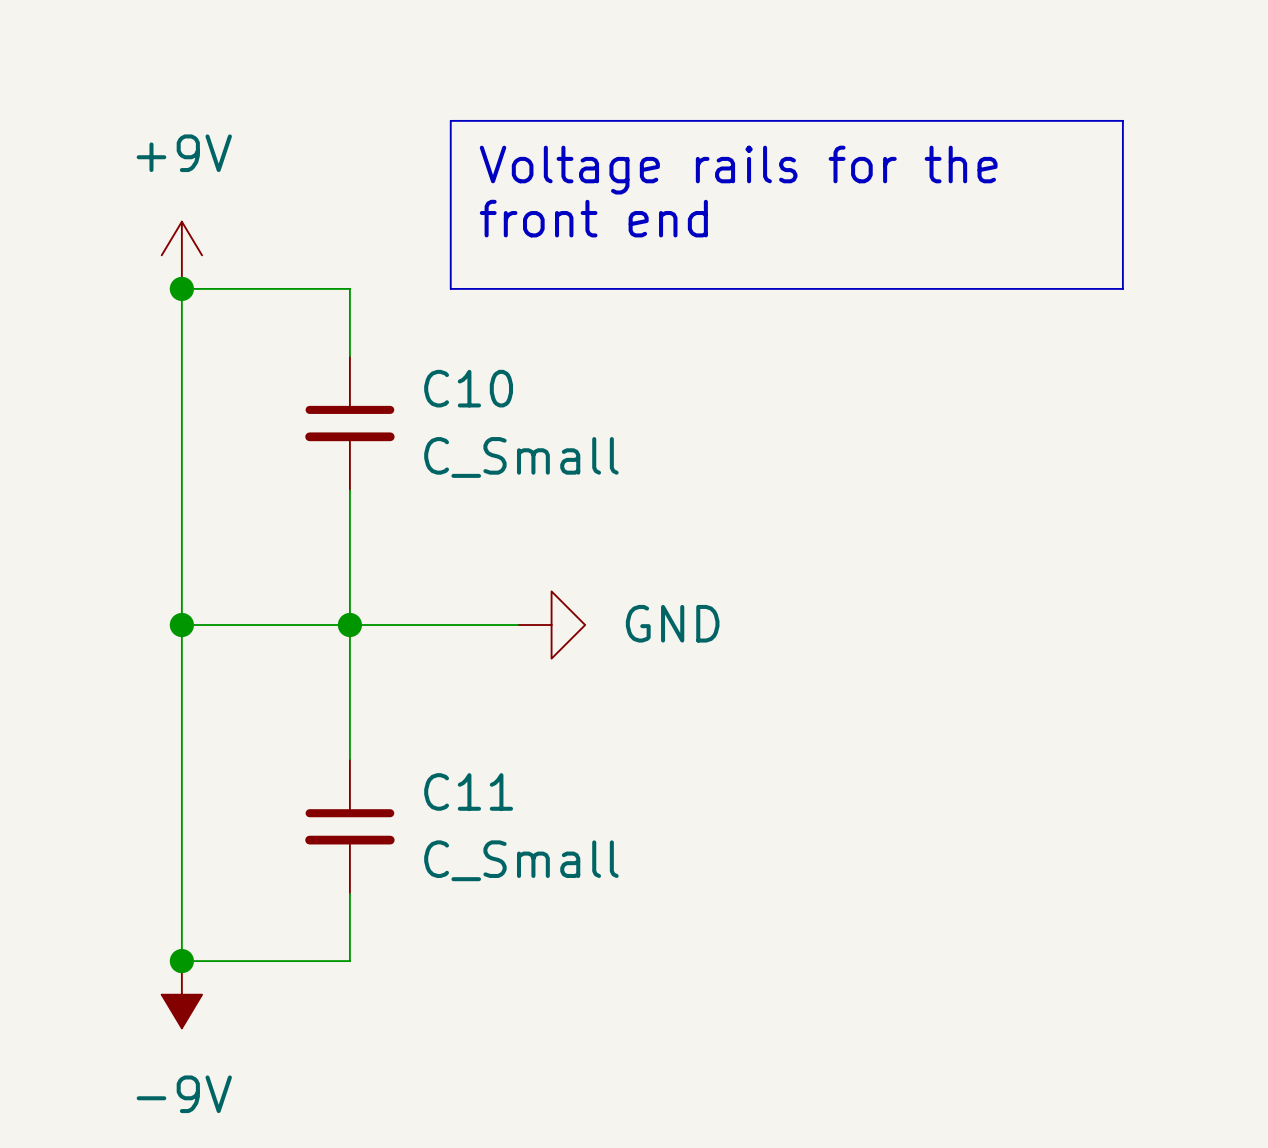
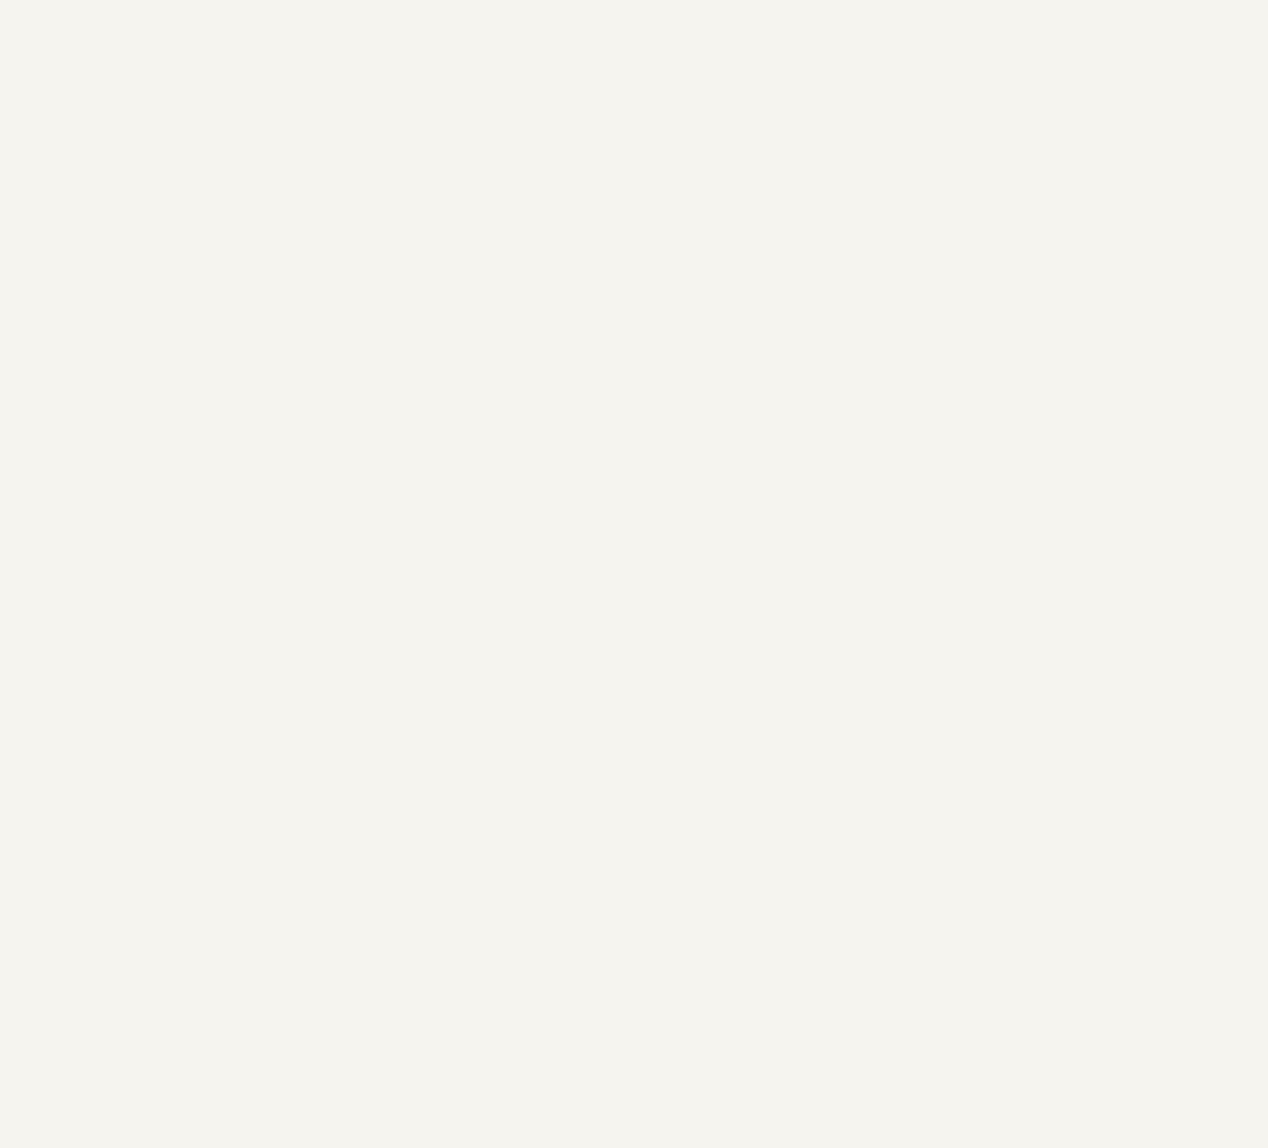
line: (450, 120) (1122, 120) (1122, 288) (450, 288) (450, 120) -> none
text: Voltage rails for the (738, 170) -> none
text: front end (593, 218) -> none
power symbol: +9V (181, 255) -> none
junction: (181, 288) -> none
wire: (349, 356) (349, 288) (181, 288) (181, 961) (349, 961) (349, 893) -> none
C10: C_Small (349, 423) -> none
wire: (349, 490) (349, 759) -> none
wire: (181, 625) (517, 625) -> none
junction: (181, 625) -> none
junction: (349, 625) -> none
power symbol: GND (551, 625) -> none
C11: C_Small (349, 826) -> none
junction: (181, 961) -> none
power symbol: -9V (181, 994) -> none

